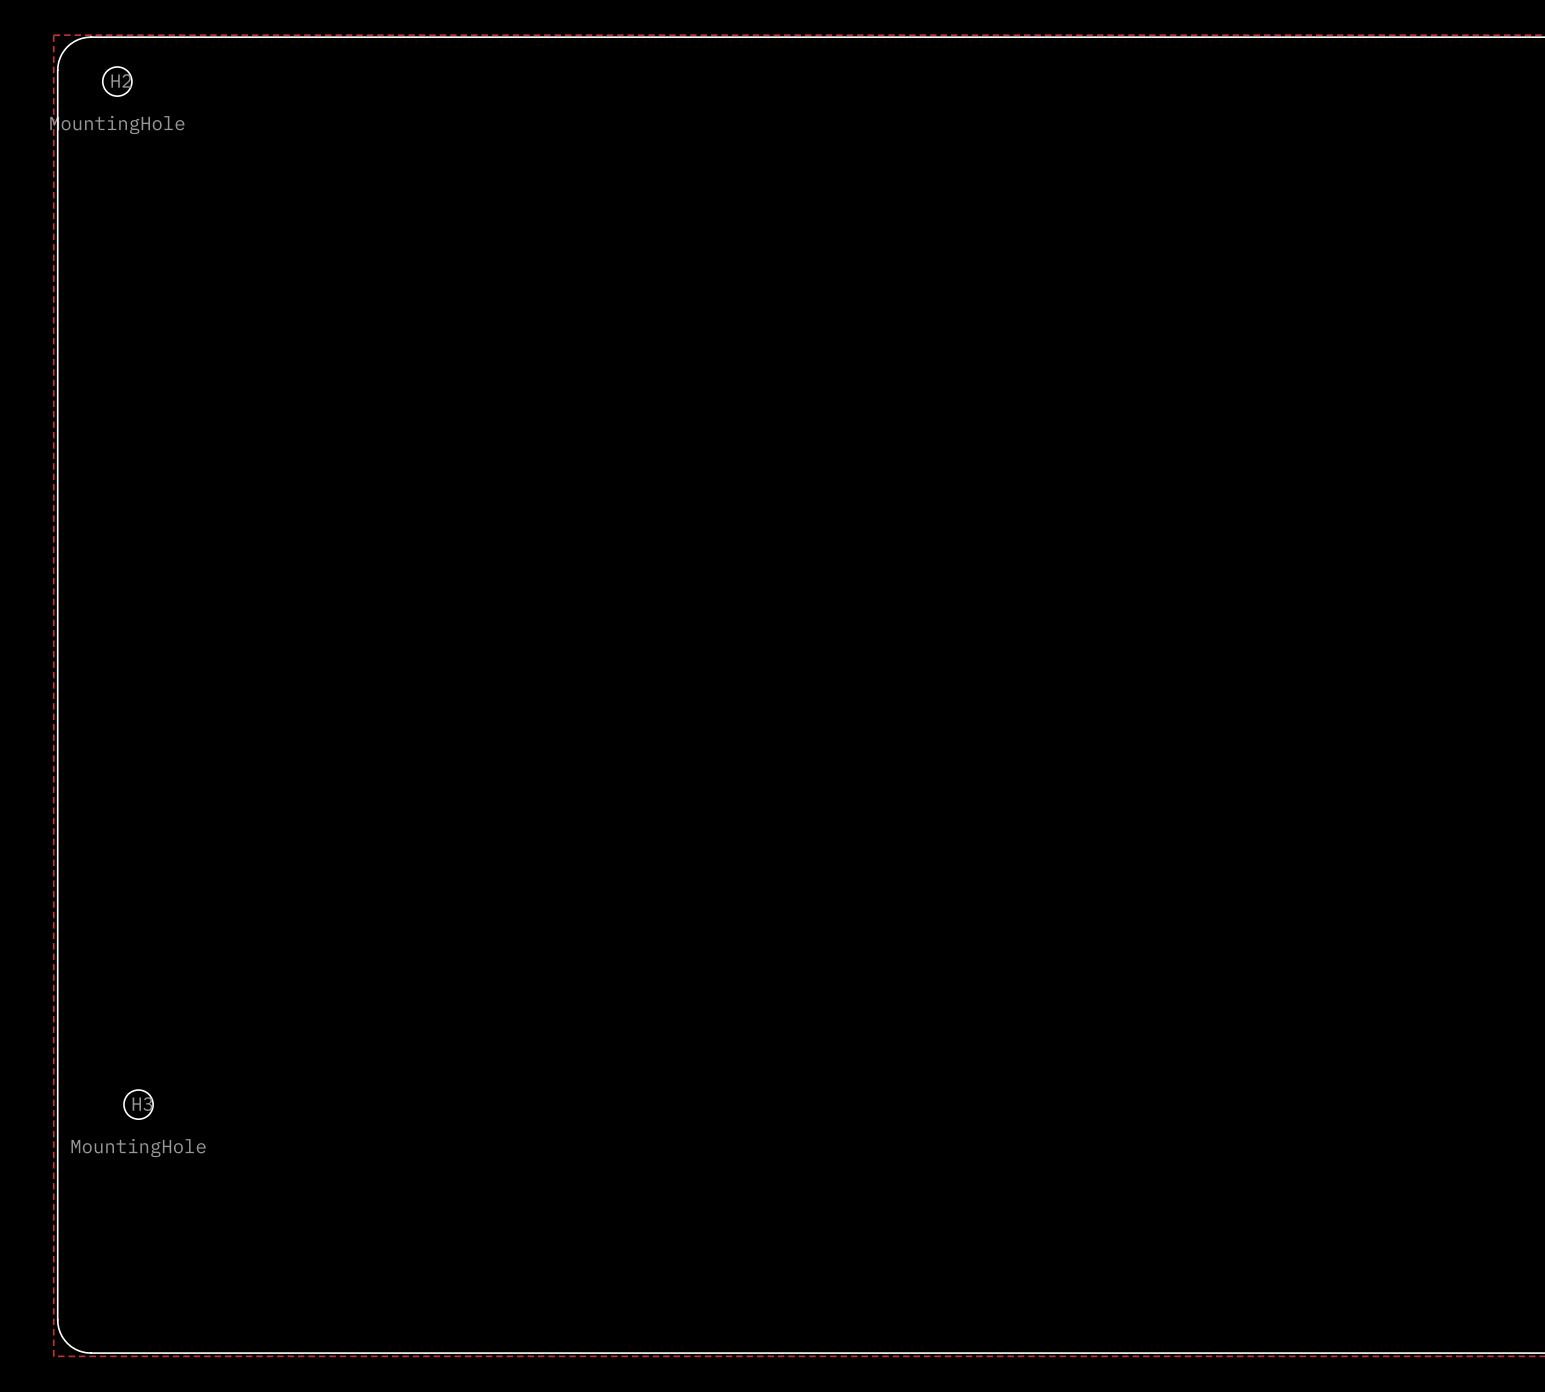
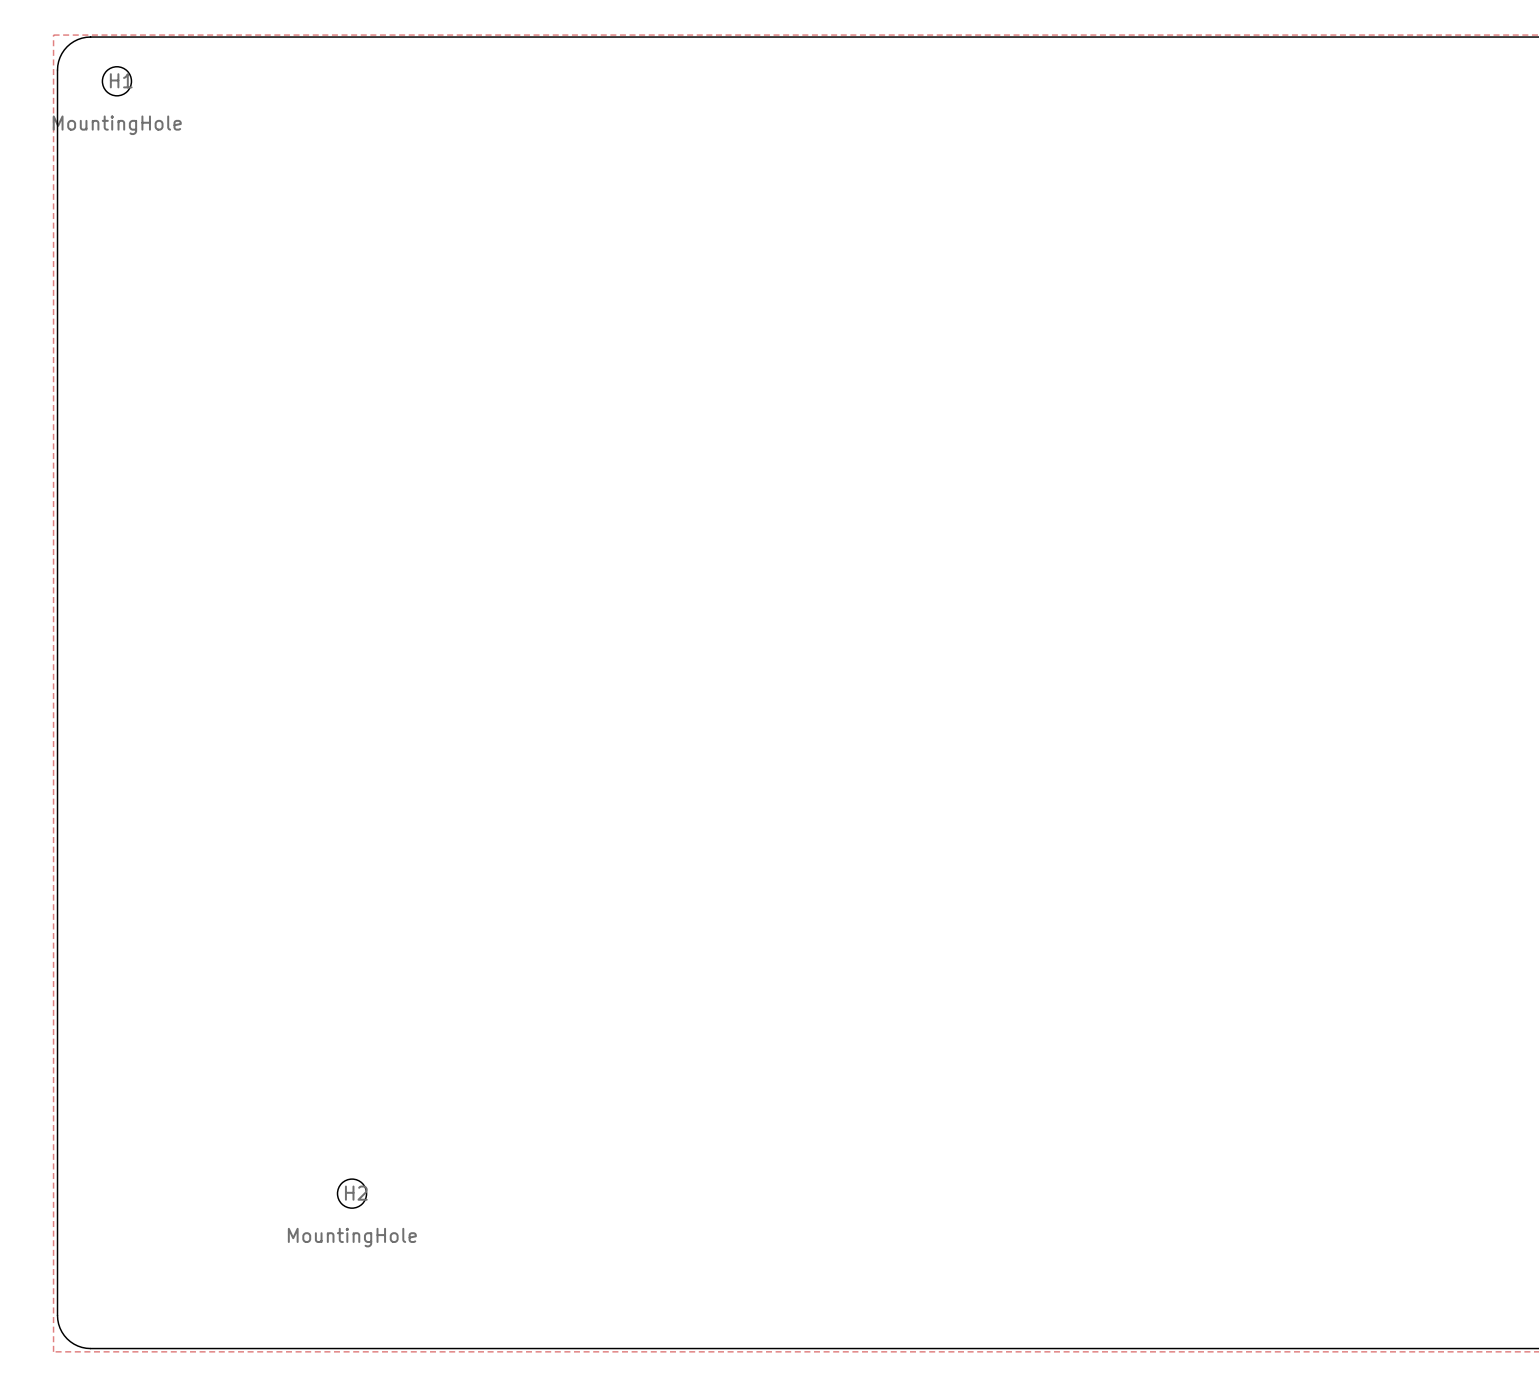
H2 name: H2 (121, 80) -> H1 (121, 80)
H3: MountingHole (138, 1104) -> none
H2: none -> MountingHole (352, 1193)

